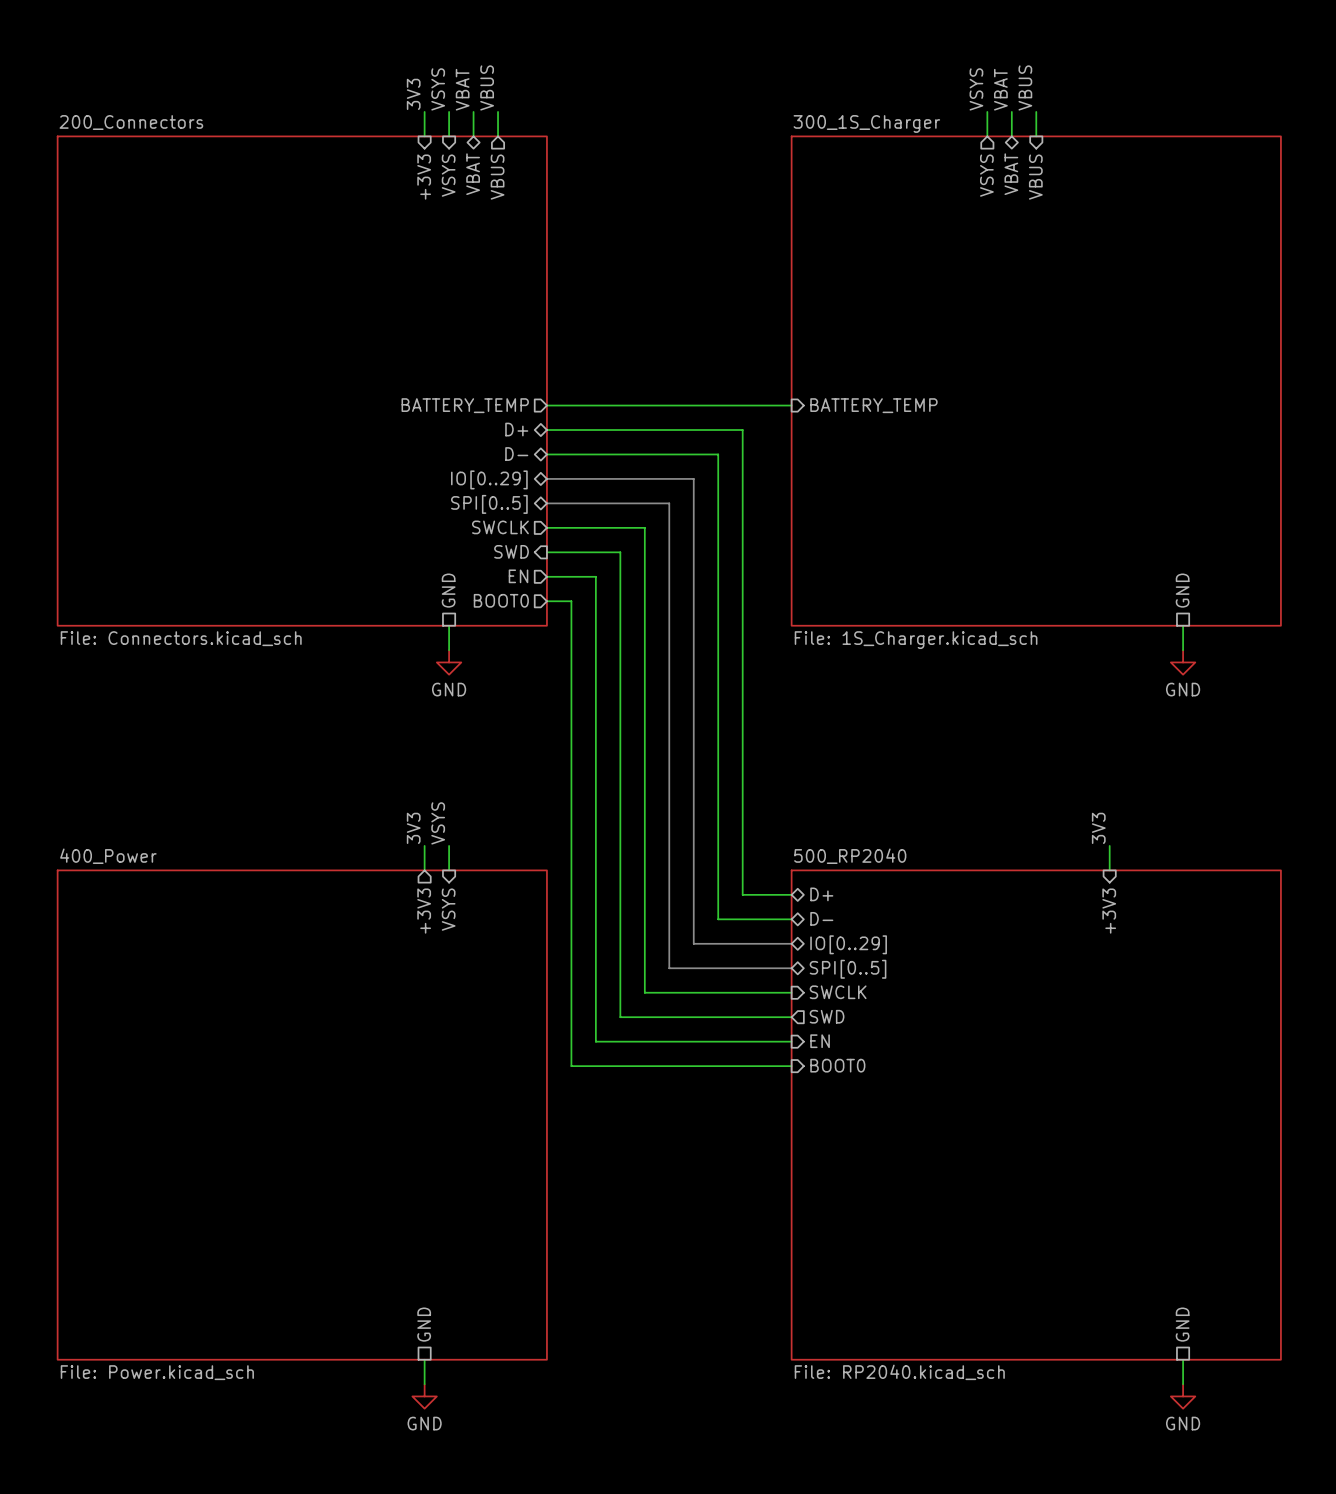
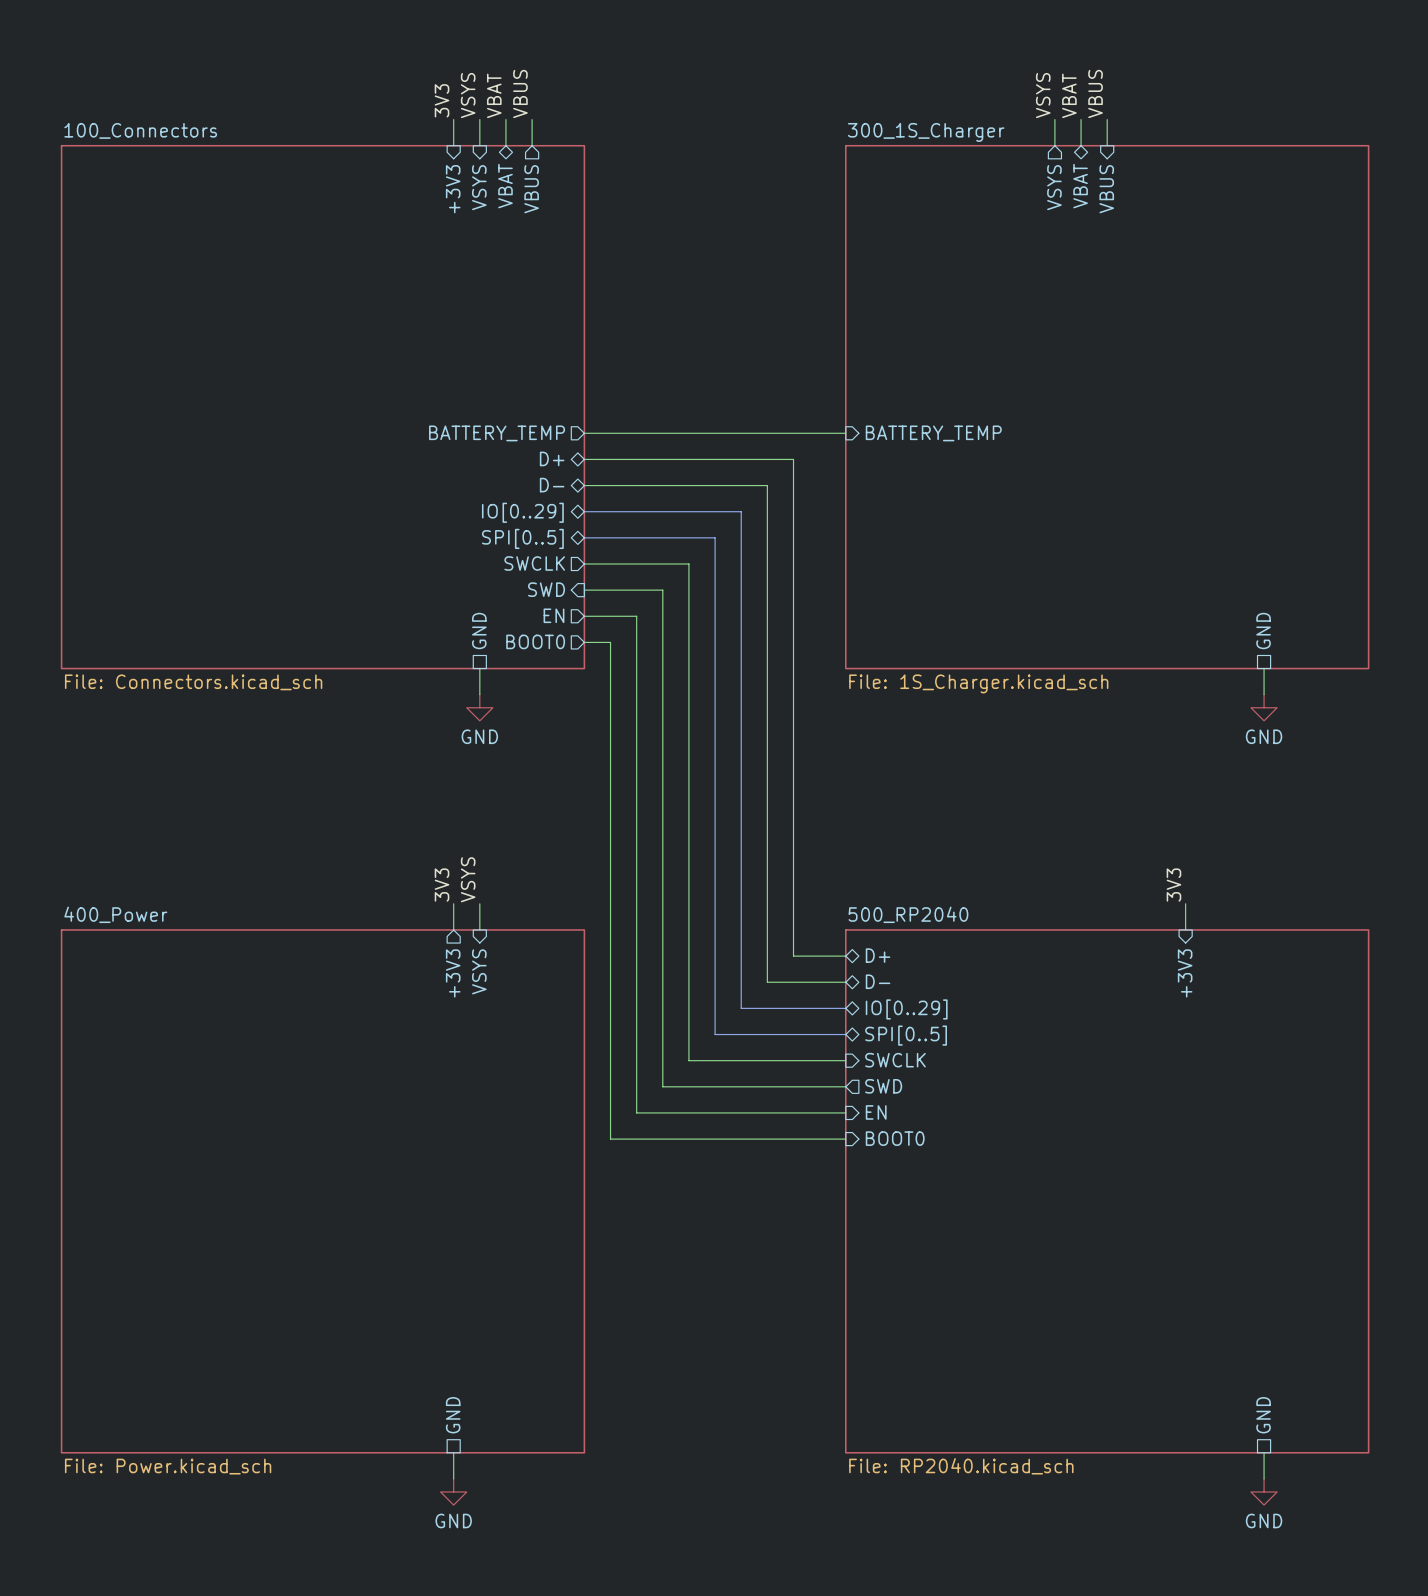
sheet 200_Connectors name: 200_Connectors (131, 122) -> 100_Connectors (140, 130)

